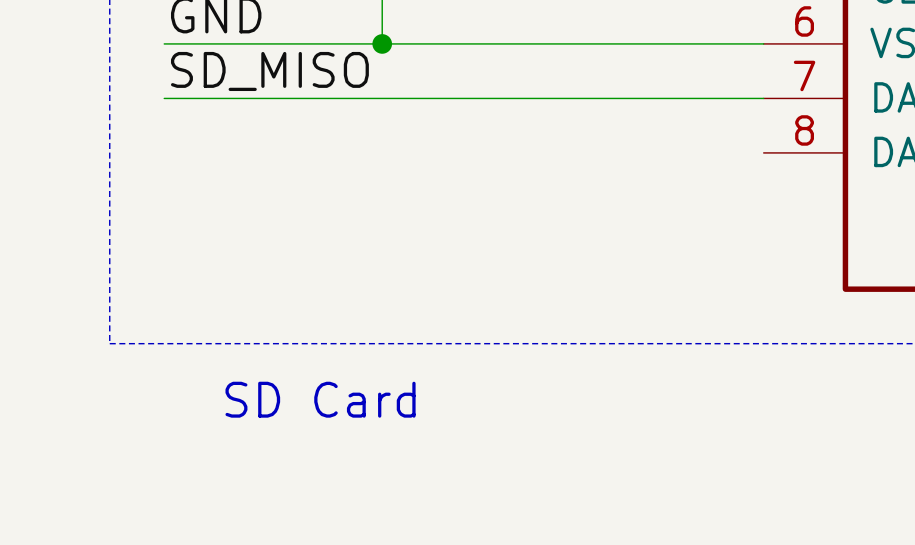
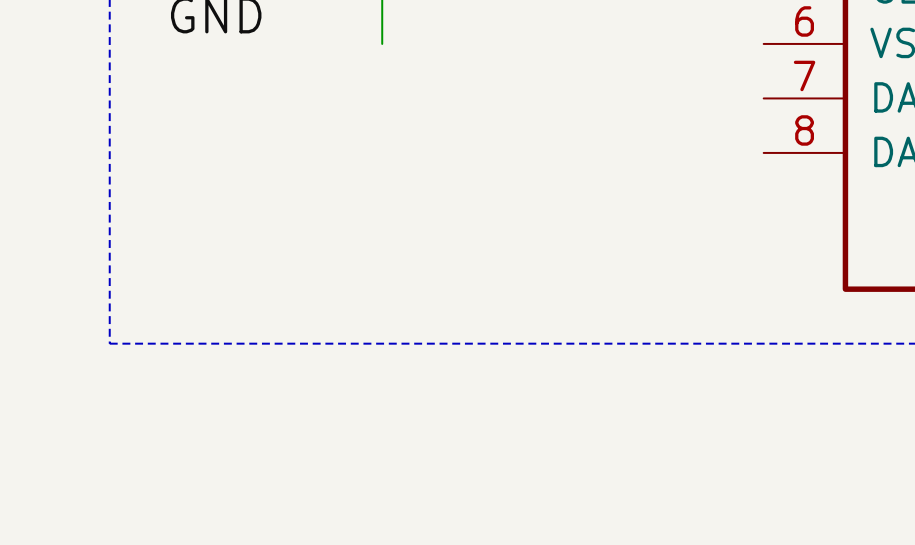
wire: (164, 43) (763, 43) -> none
junction: (382, 43) -> none
label: SD_MISO (269, 71) -> none
wire: (164, 98) (763, 98) -> none
text: SD Card (320, 399) -> none

